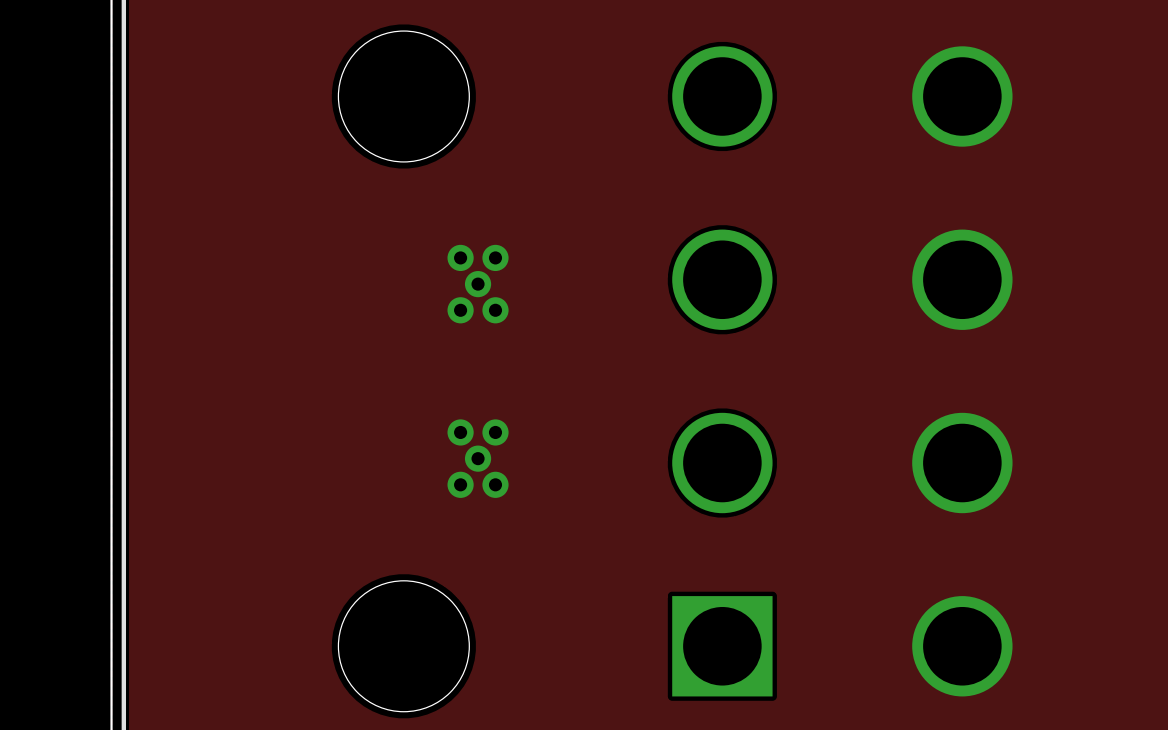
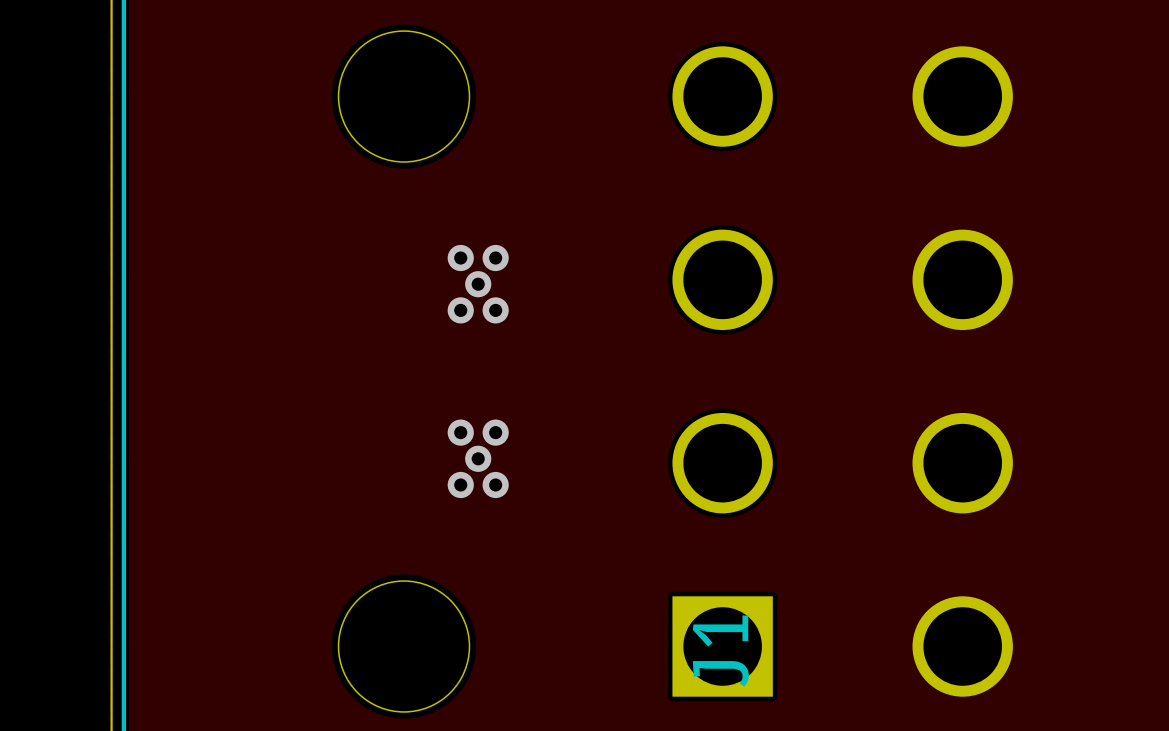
J1 name: none -> J1 (720, 651)

